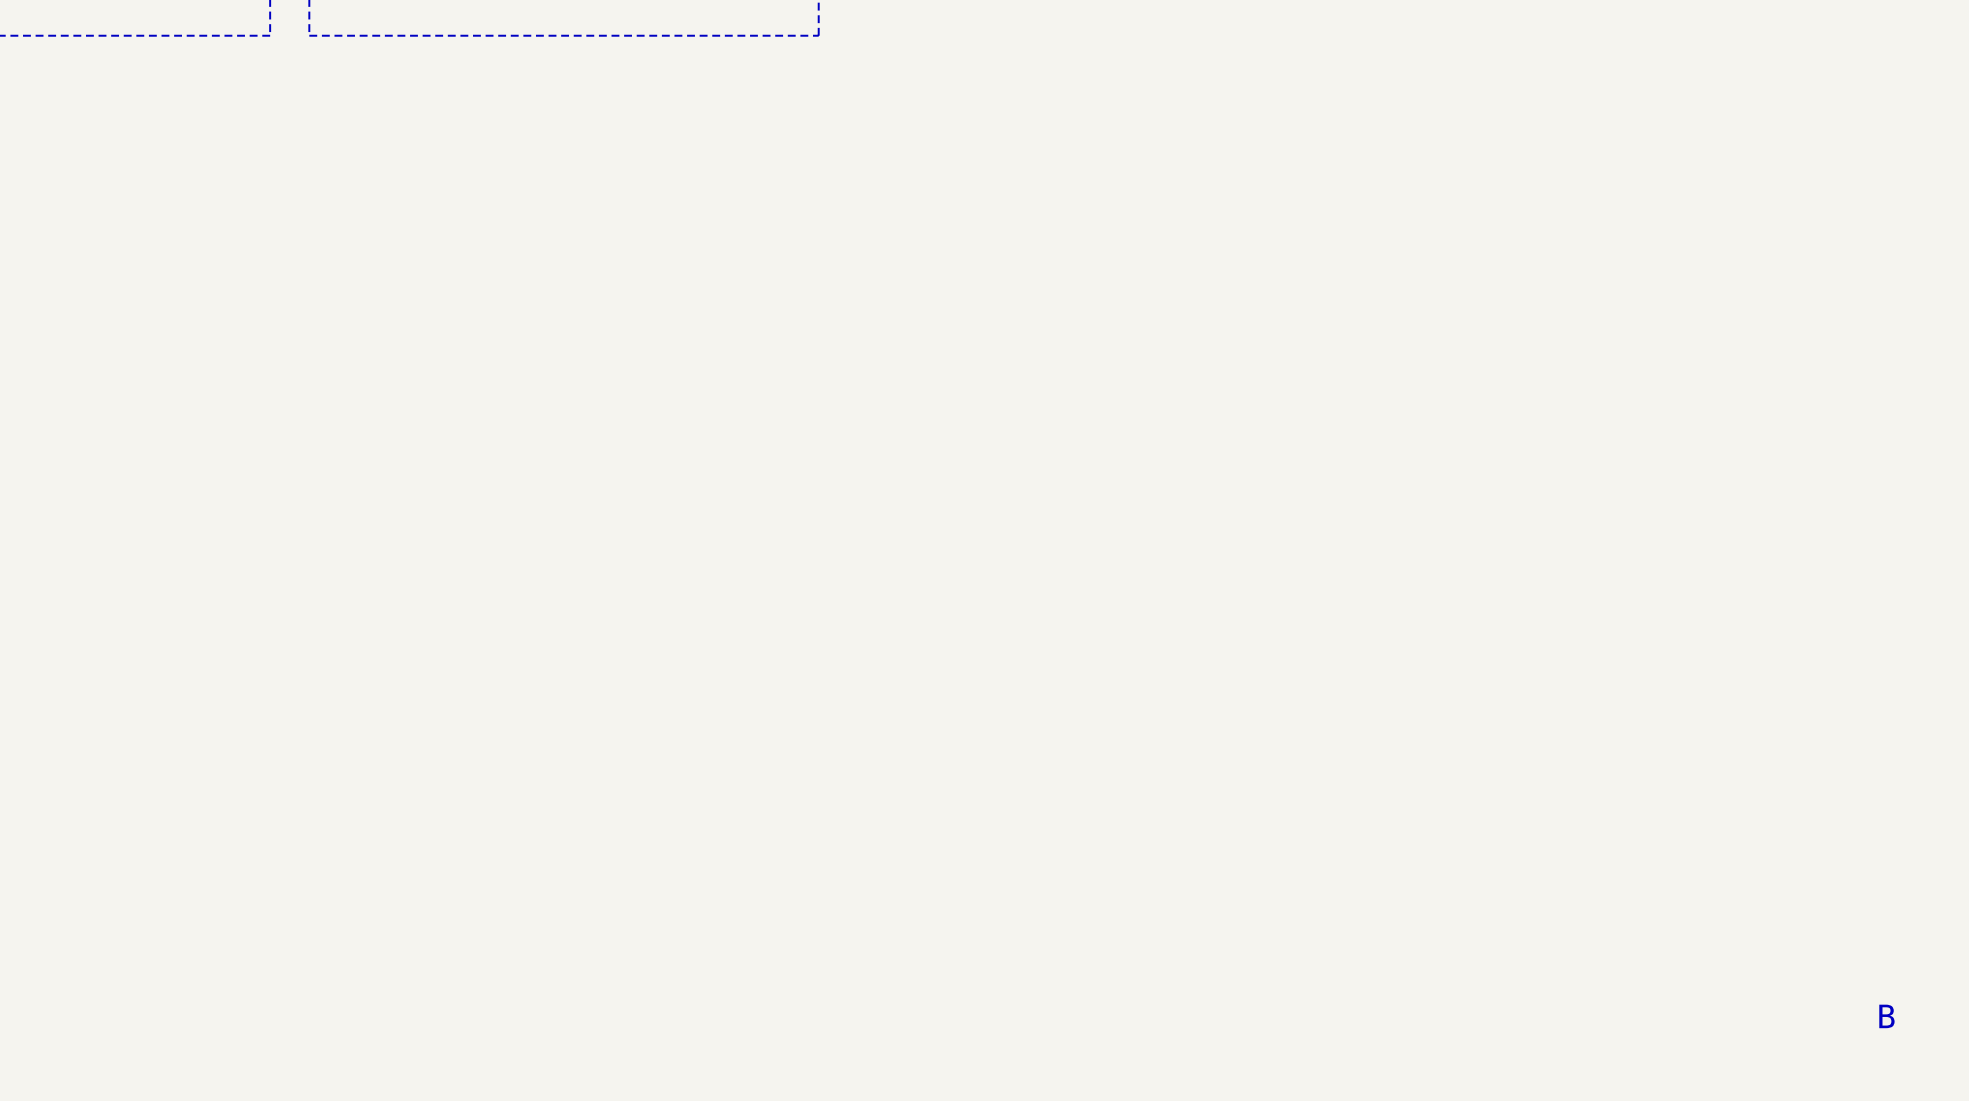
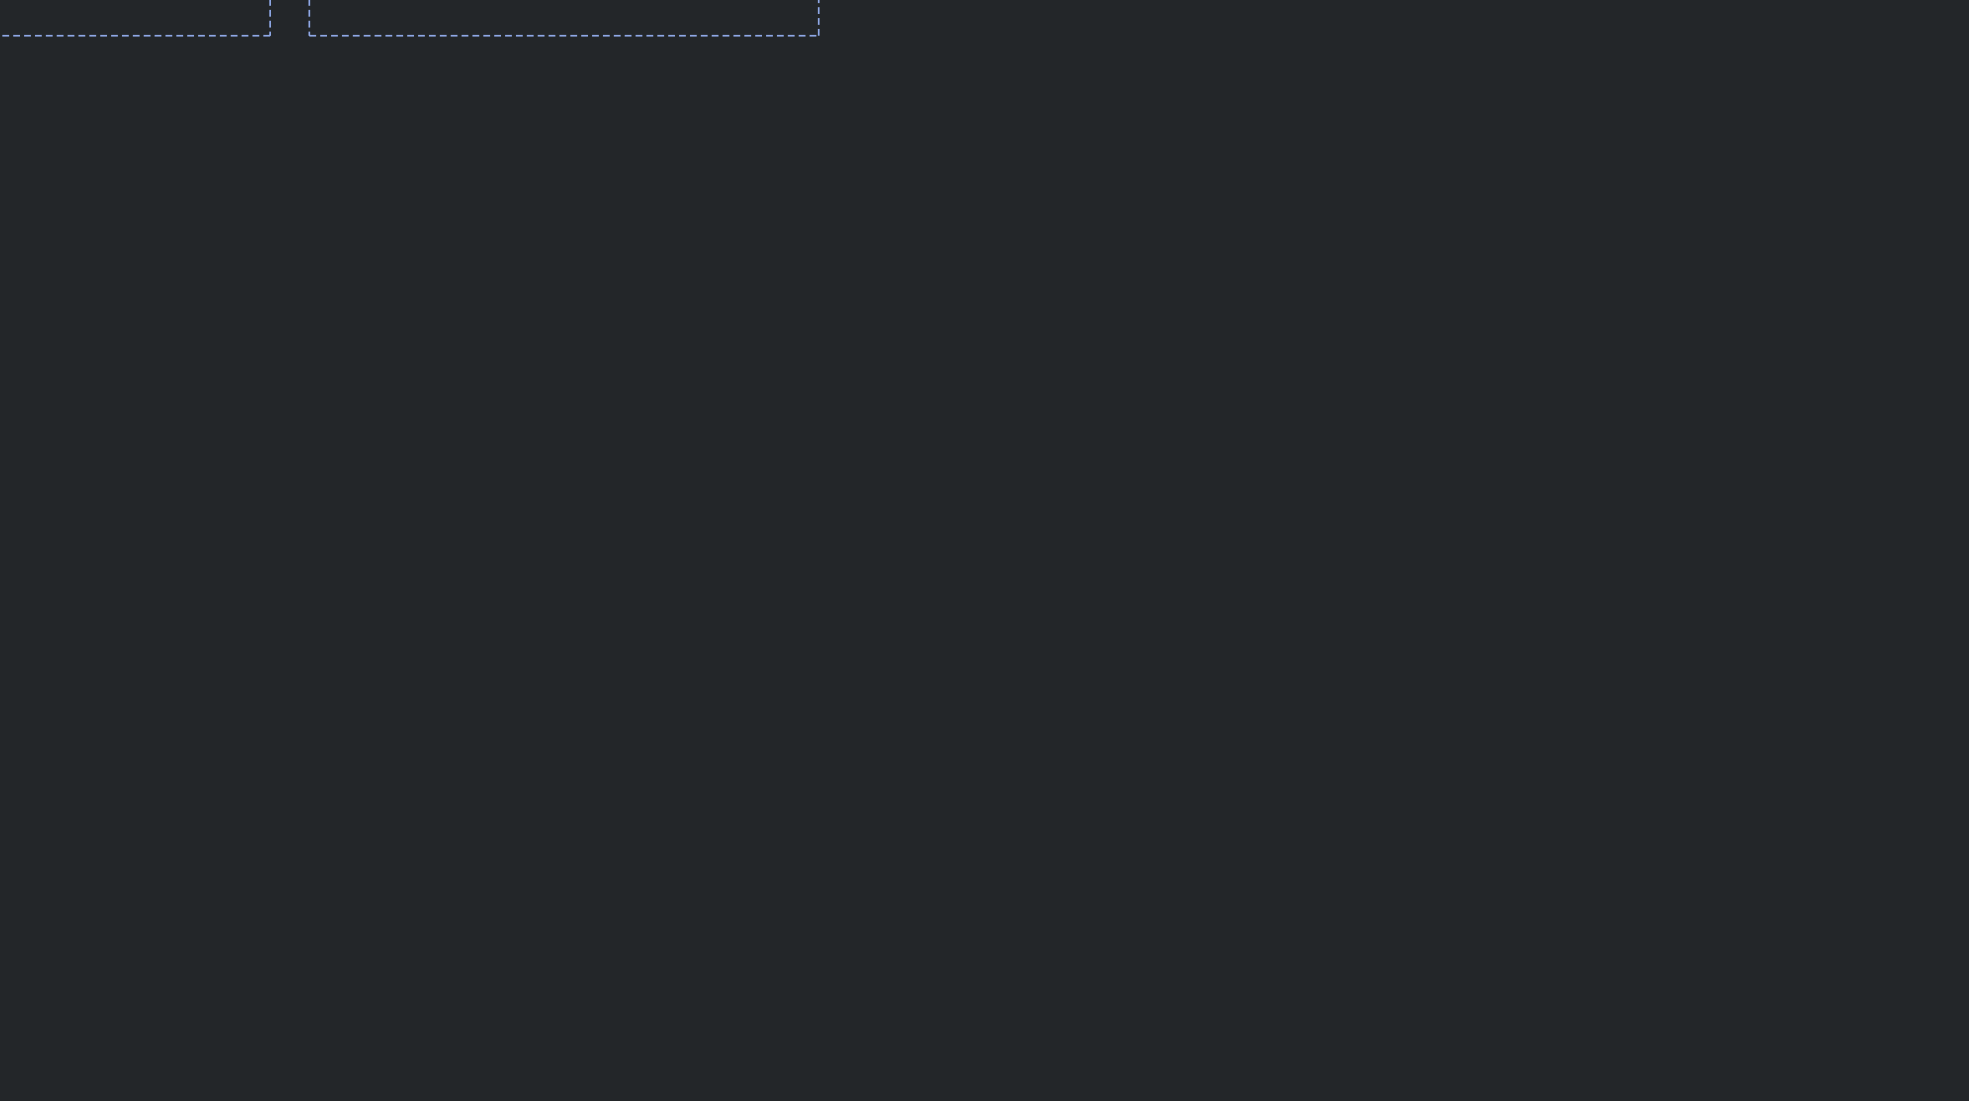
text: B (1886, 1016) -> none

